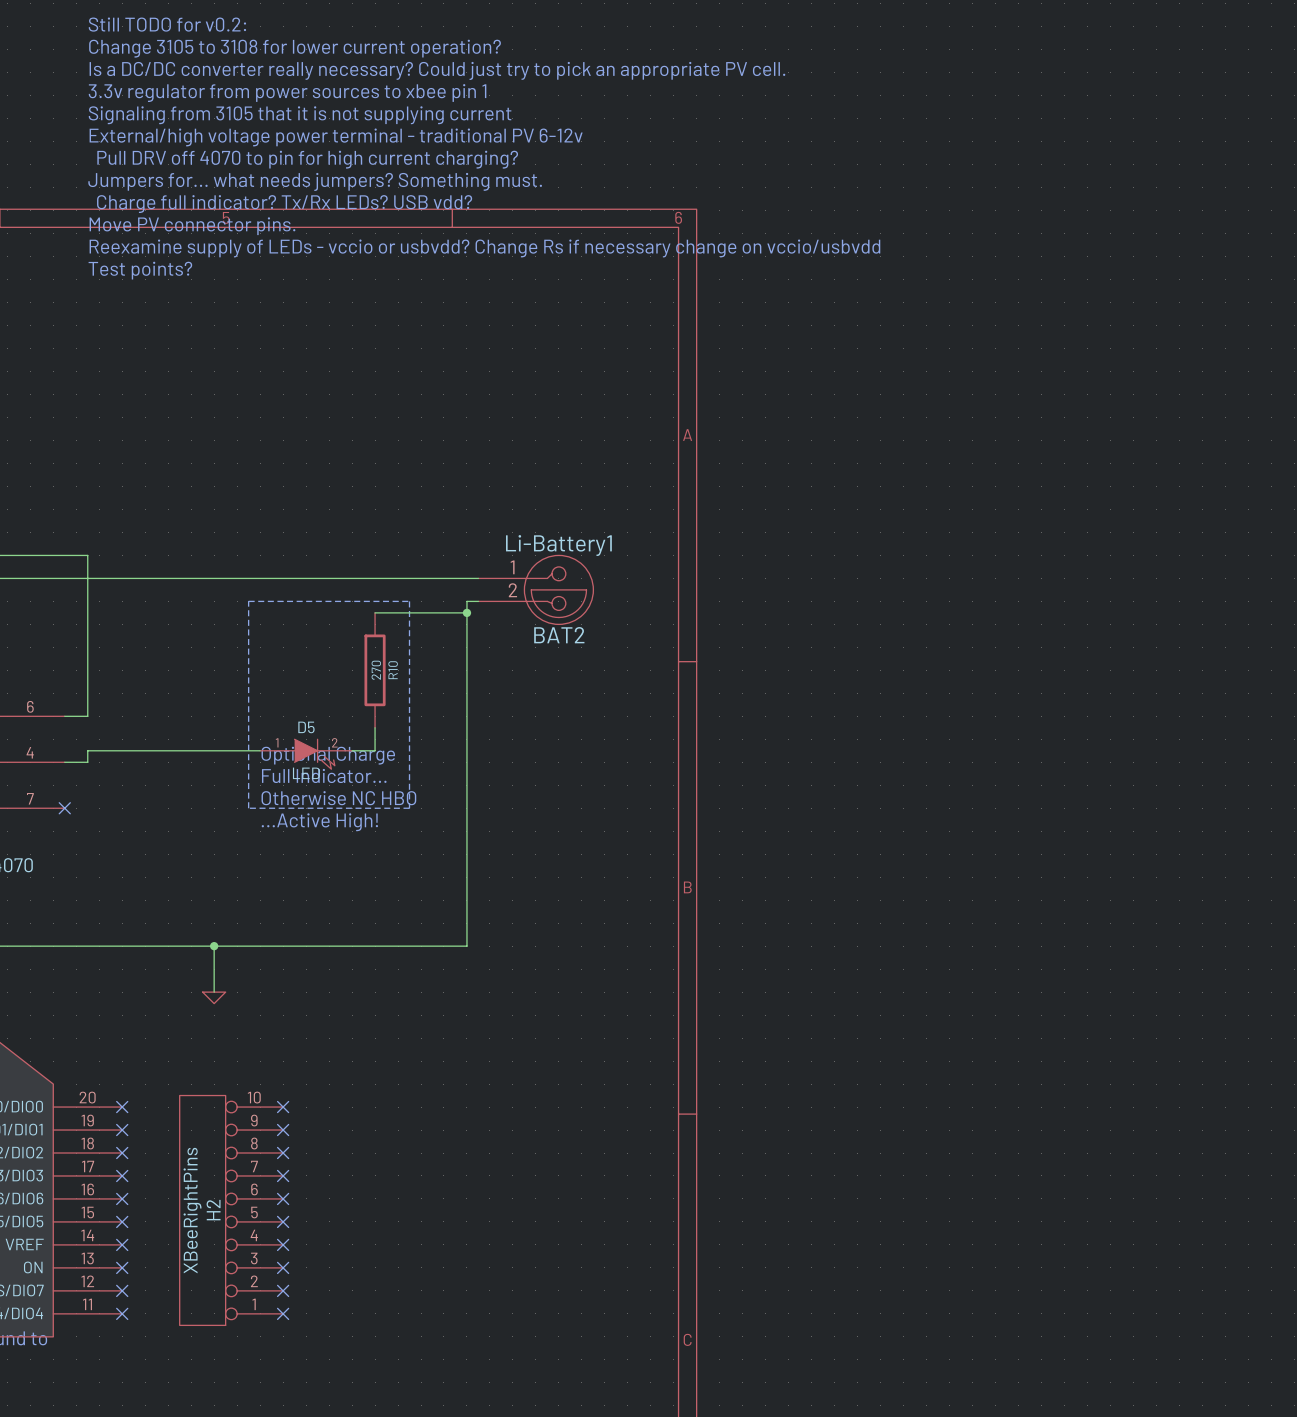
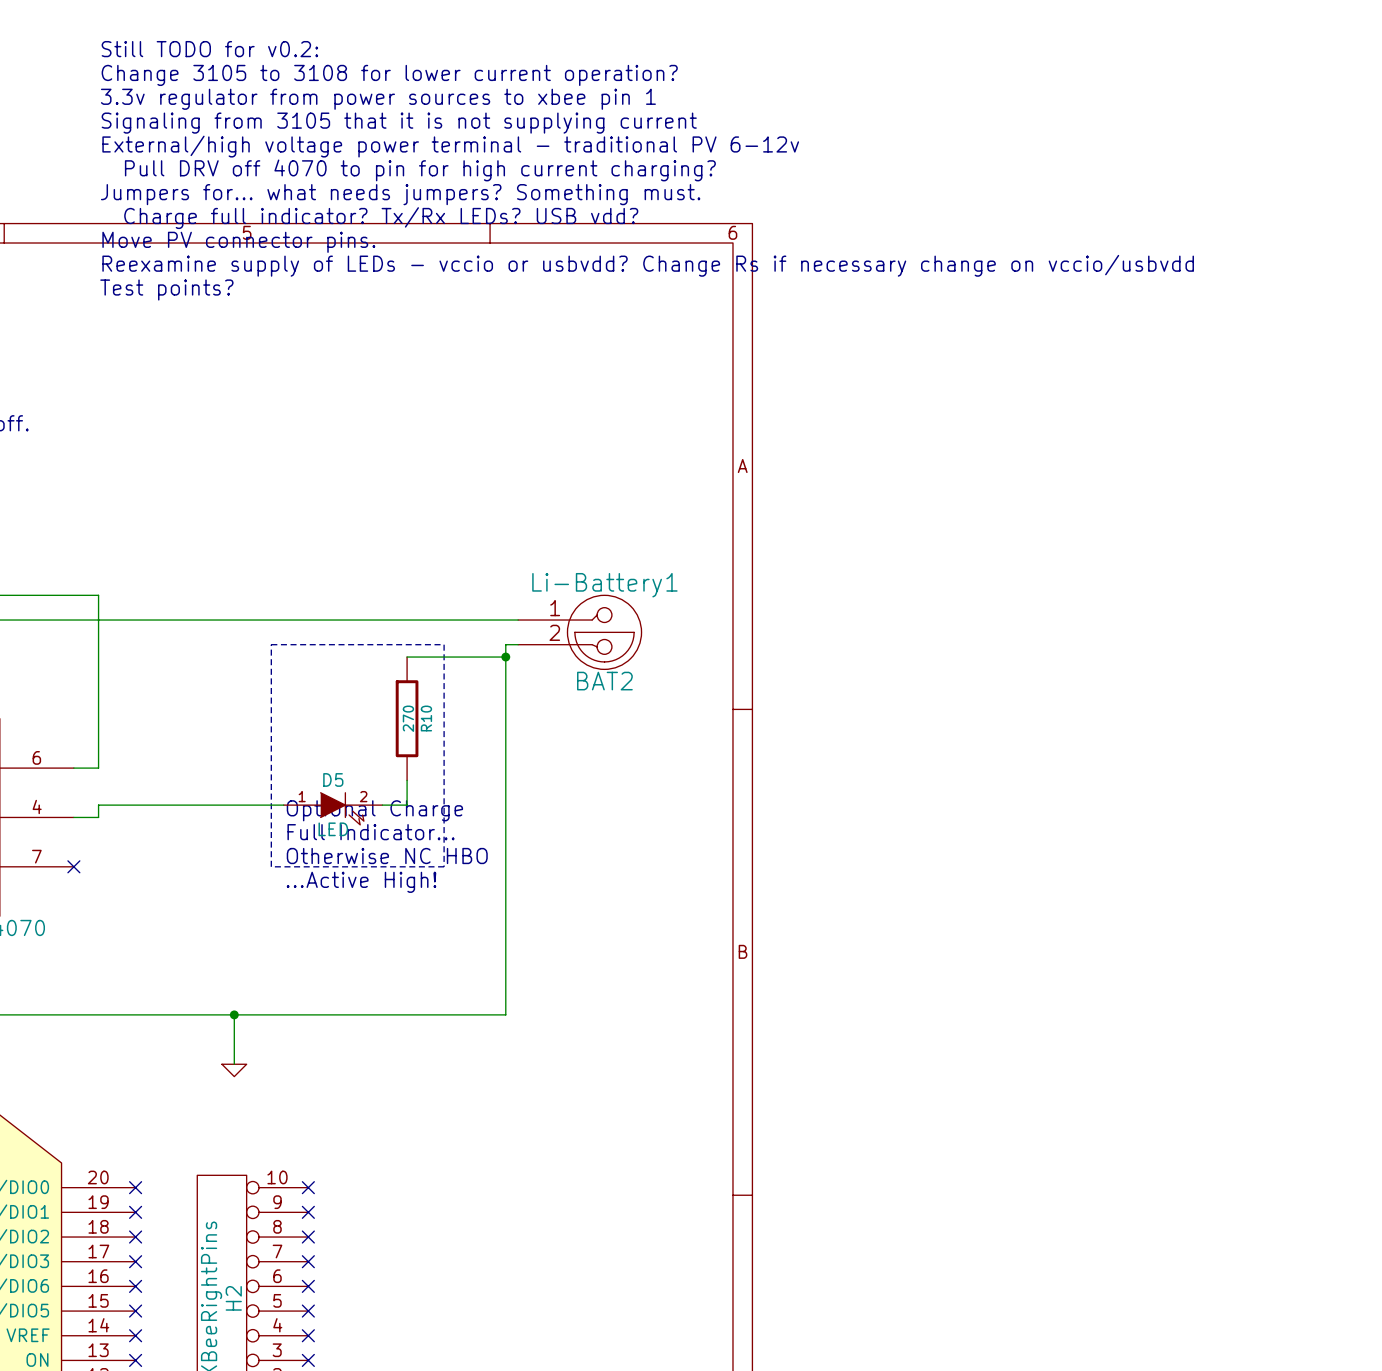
text: Still TODO for v0.2: (167, 24) -> none
text: Change 3105 to 3108 for lower current operation? (295, 48) -> Still TODO for v0.2: (209, 49)
text: Is a DC/DC converter really necessary? Could just try to pick an appropriate PV cell. (437, 70) -> Change 3105 to 3108 for lower current operation? (389, 75)

